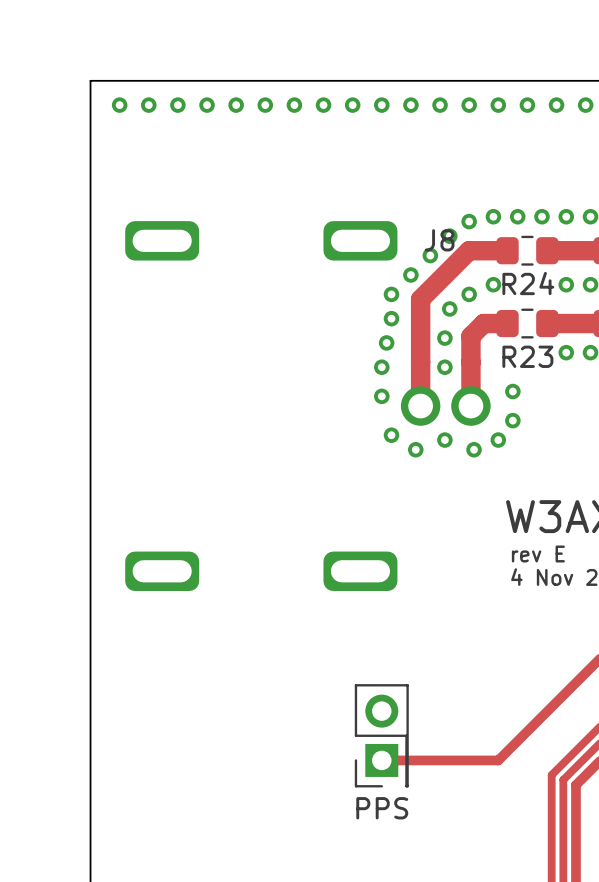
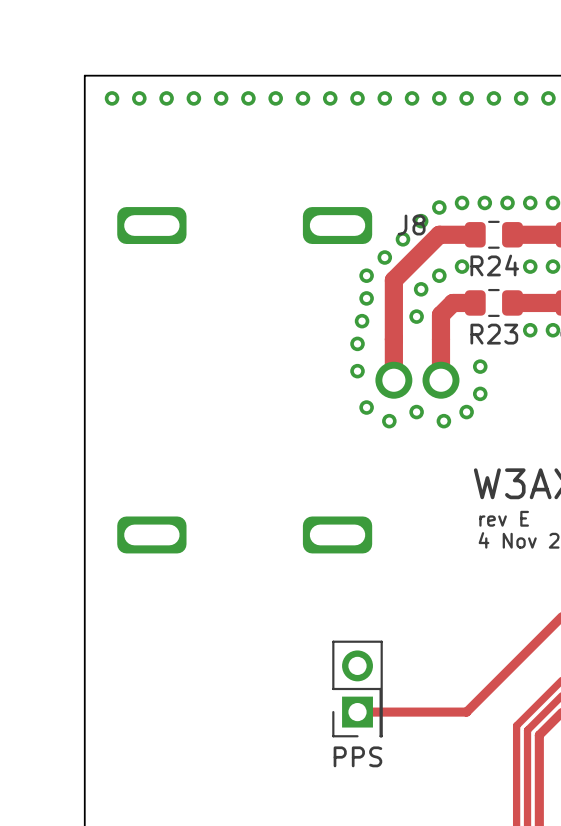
via: (444, 367) -> none

